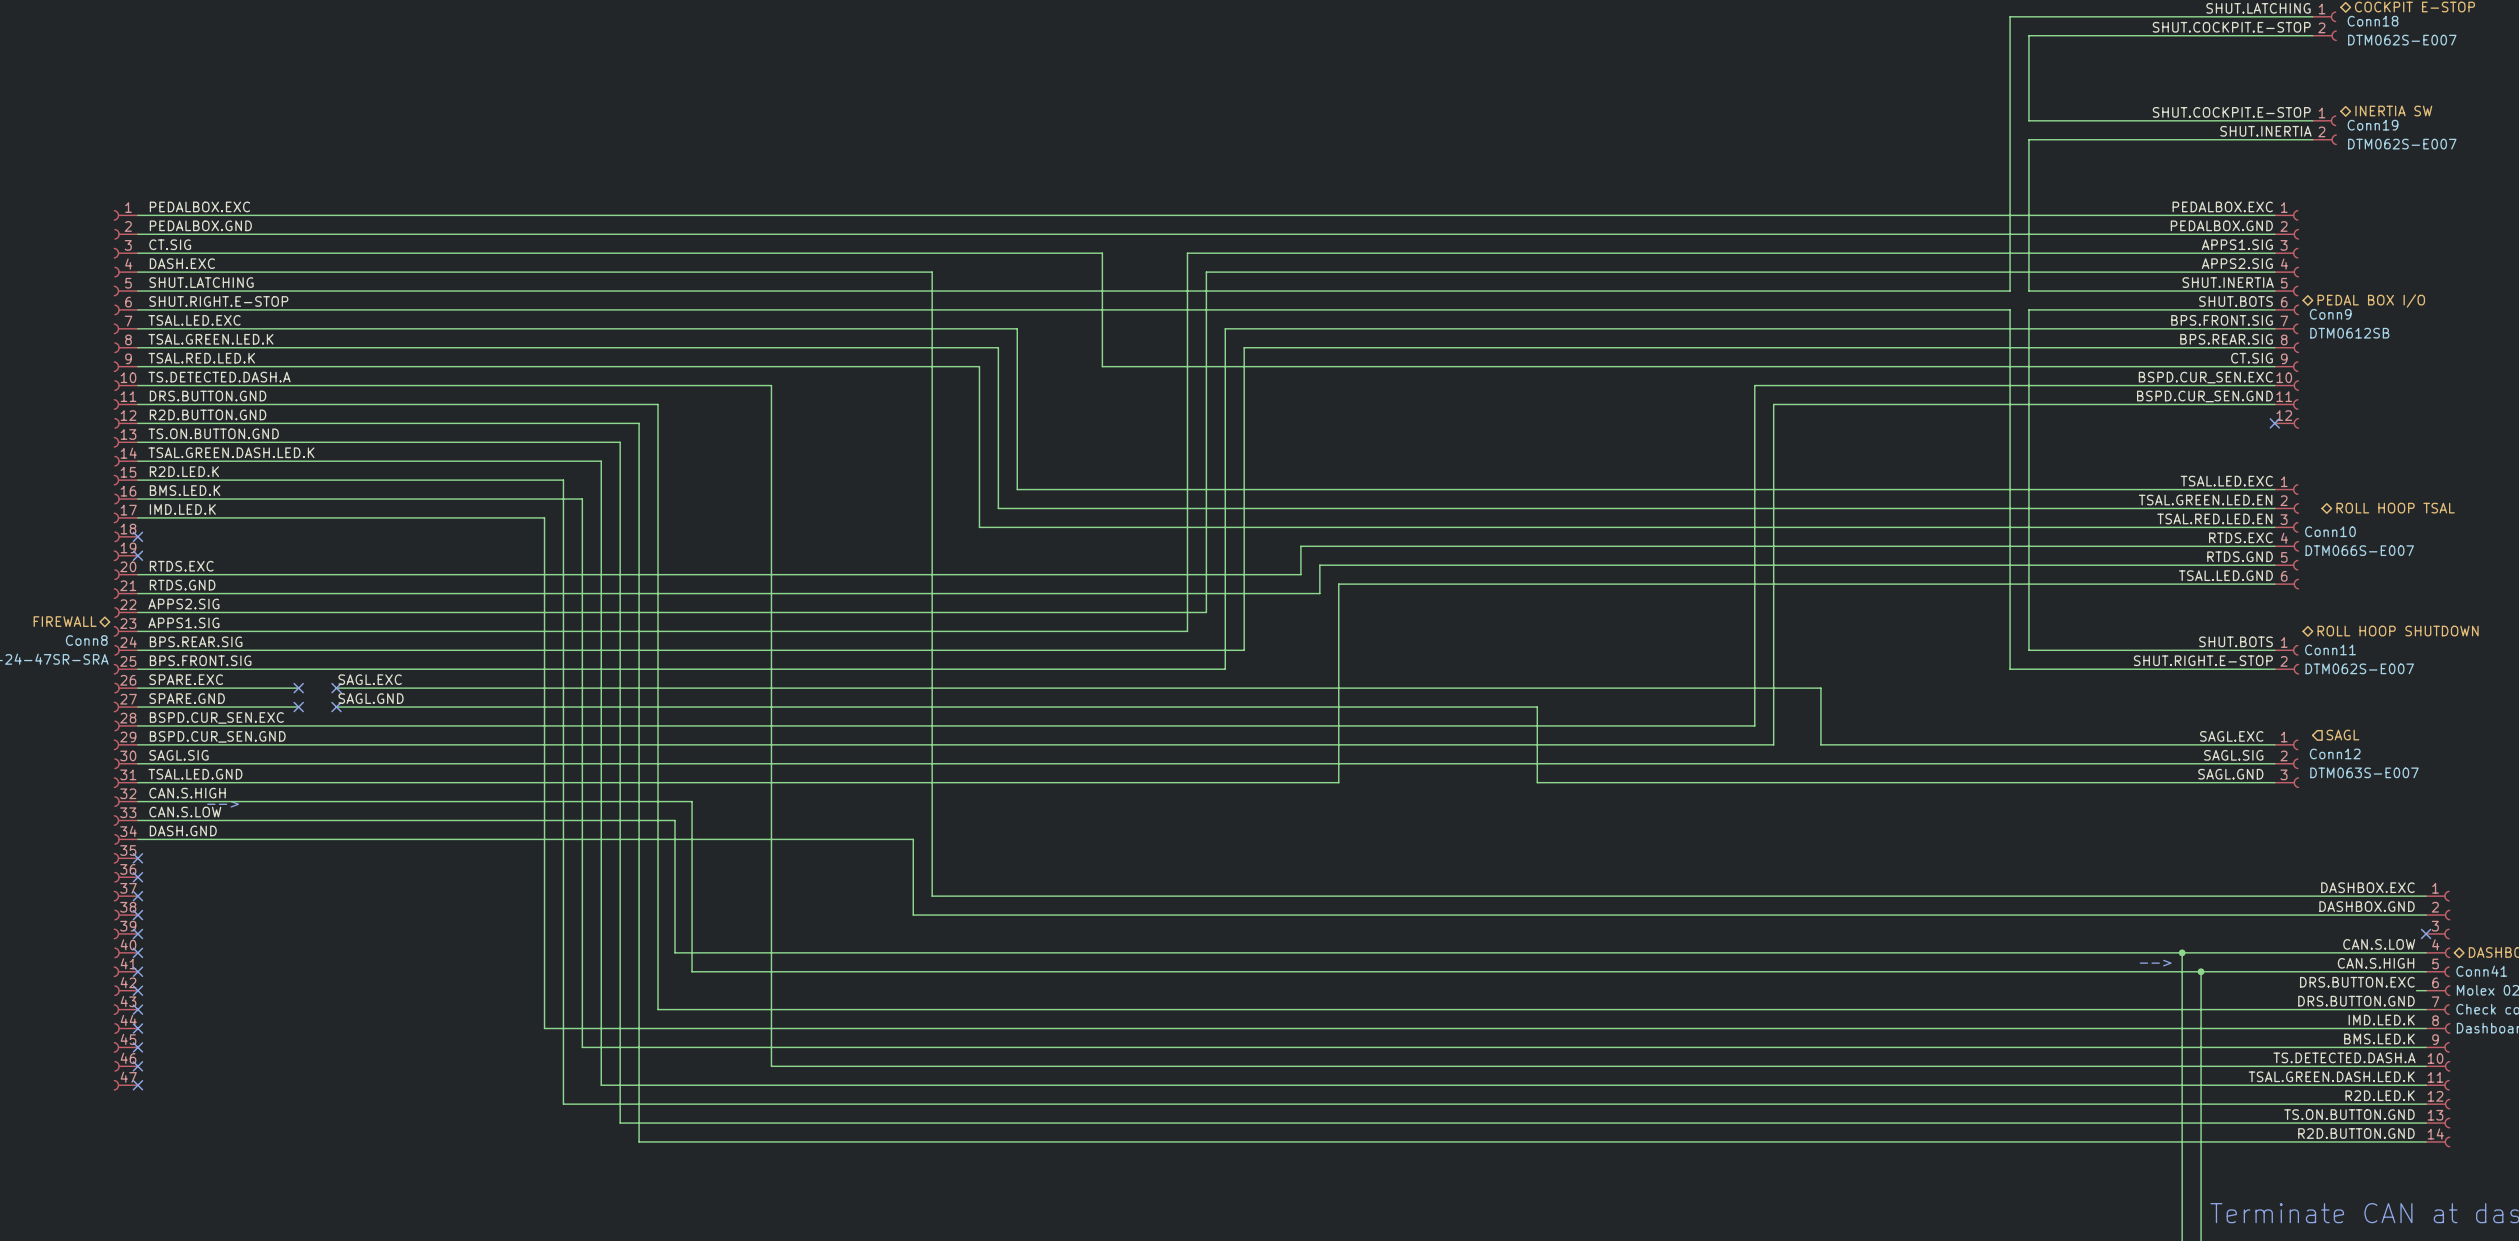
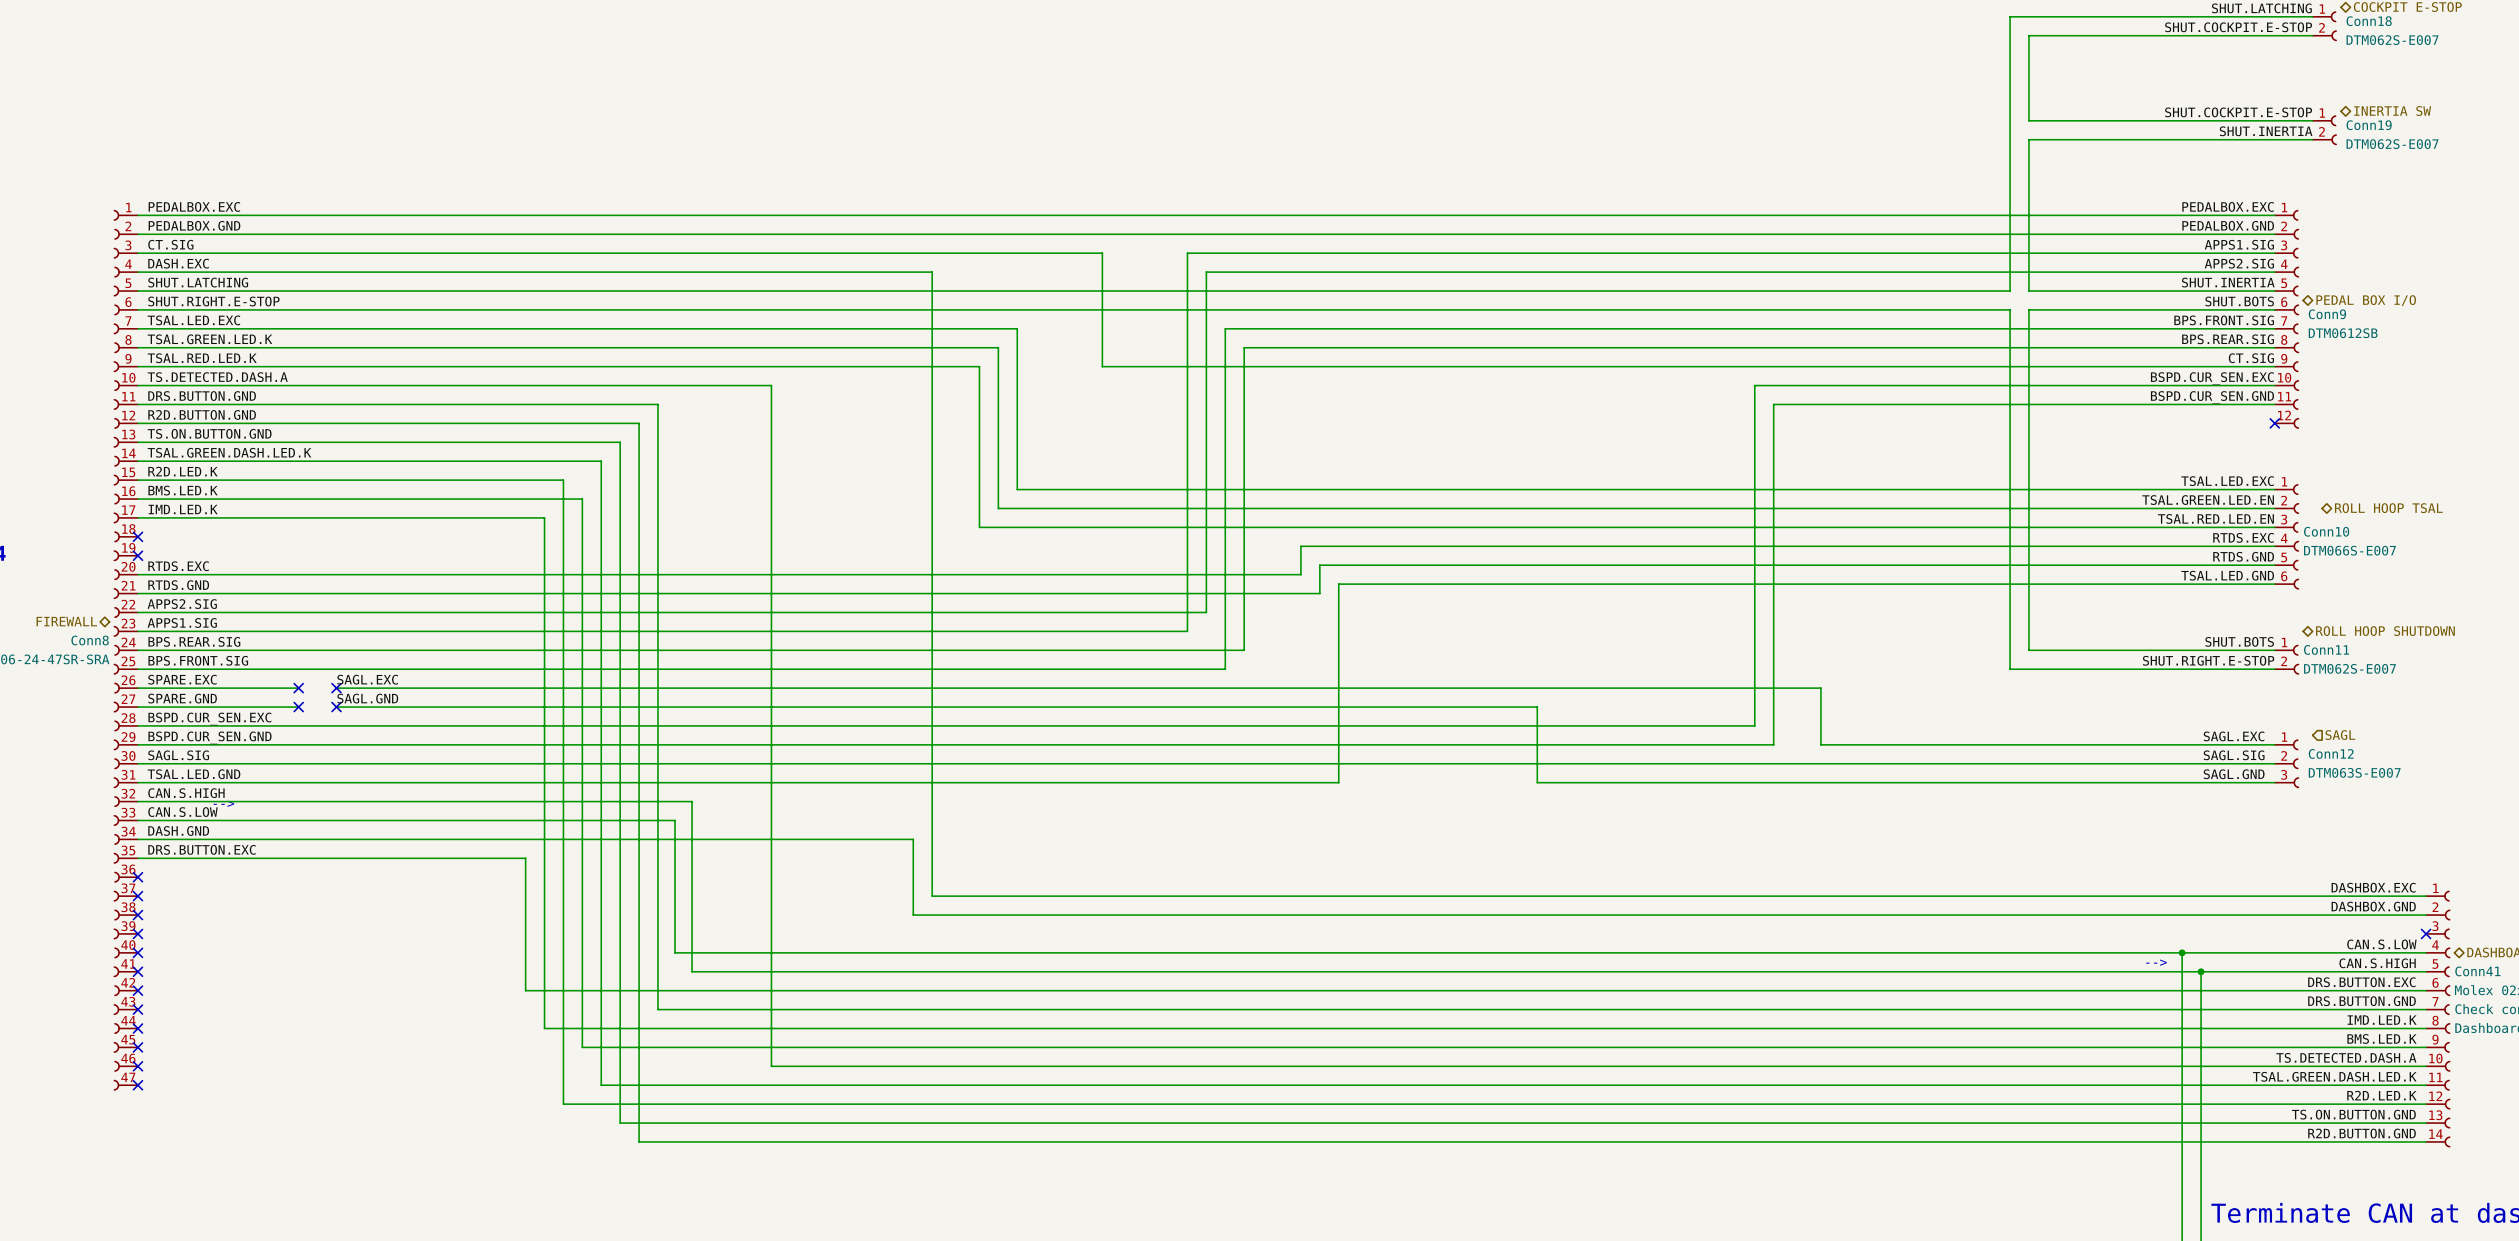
label: none -> DRS.BUTTON.EXC (202, 849)
wire: none -> (137, 858) (525, 858) (525, 990) (2416, 990)
no-connect mark: (137, 858) -> none

